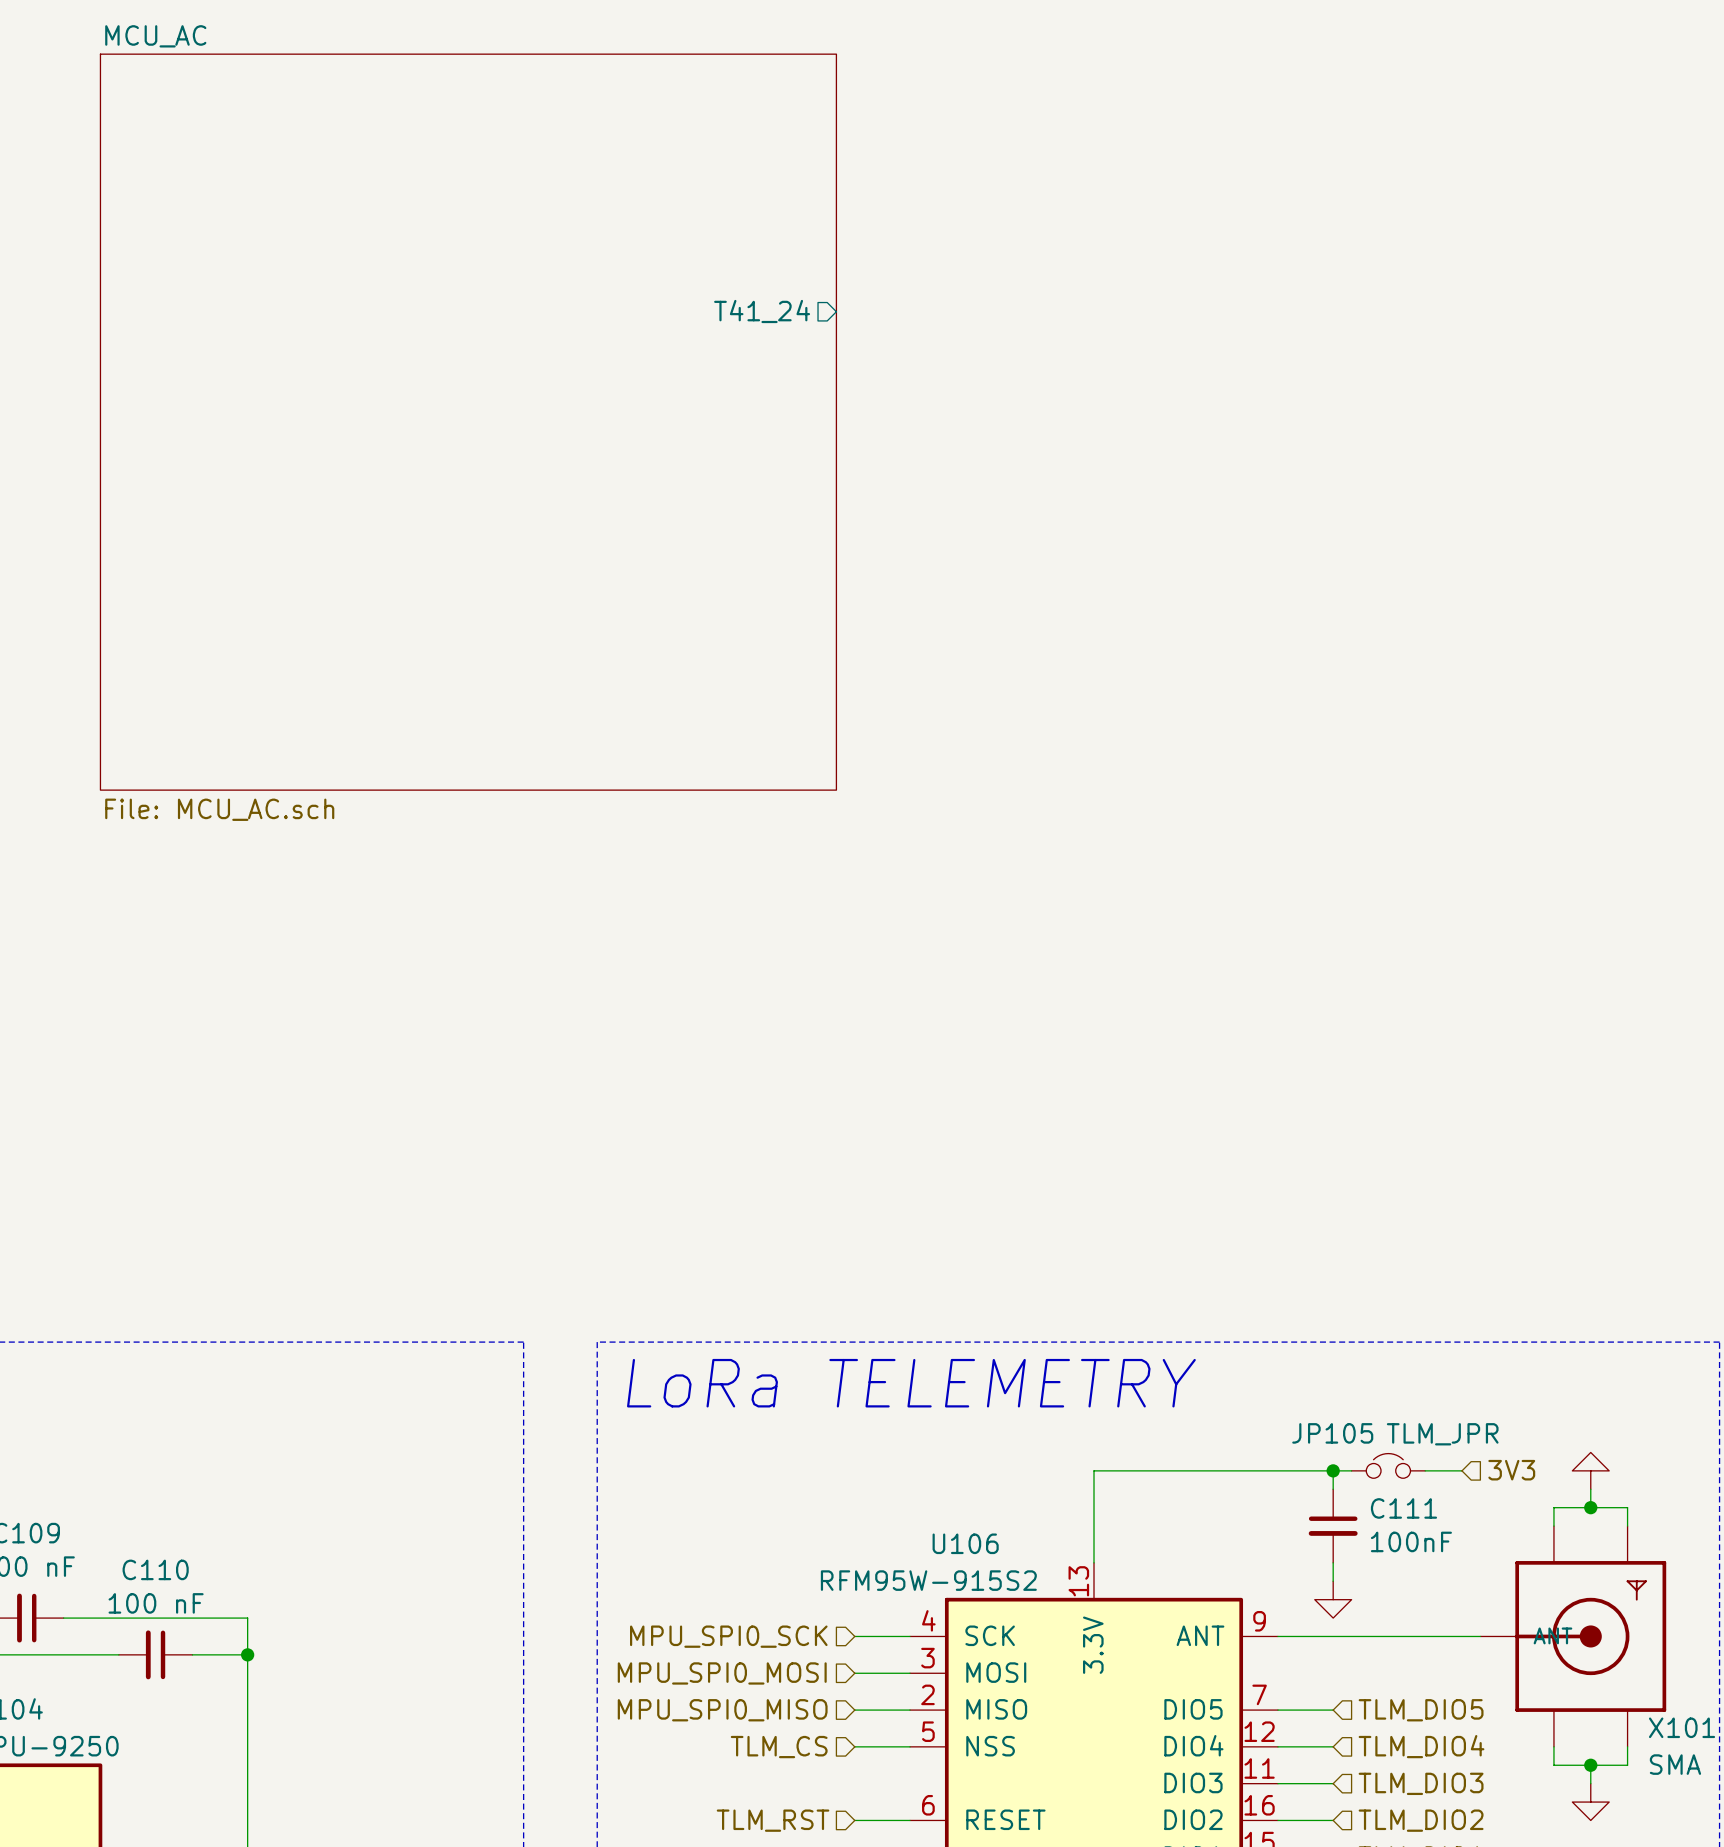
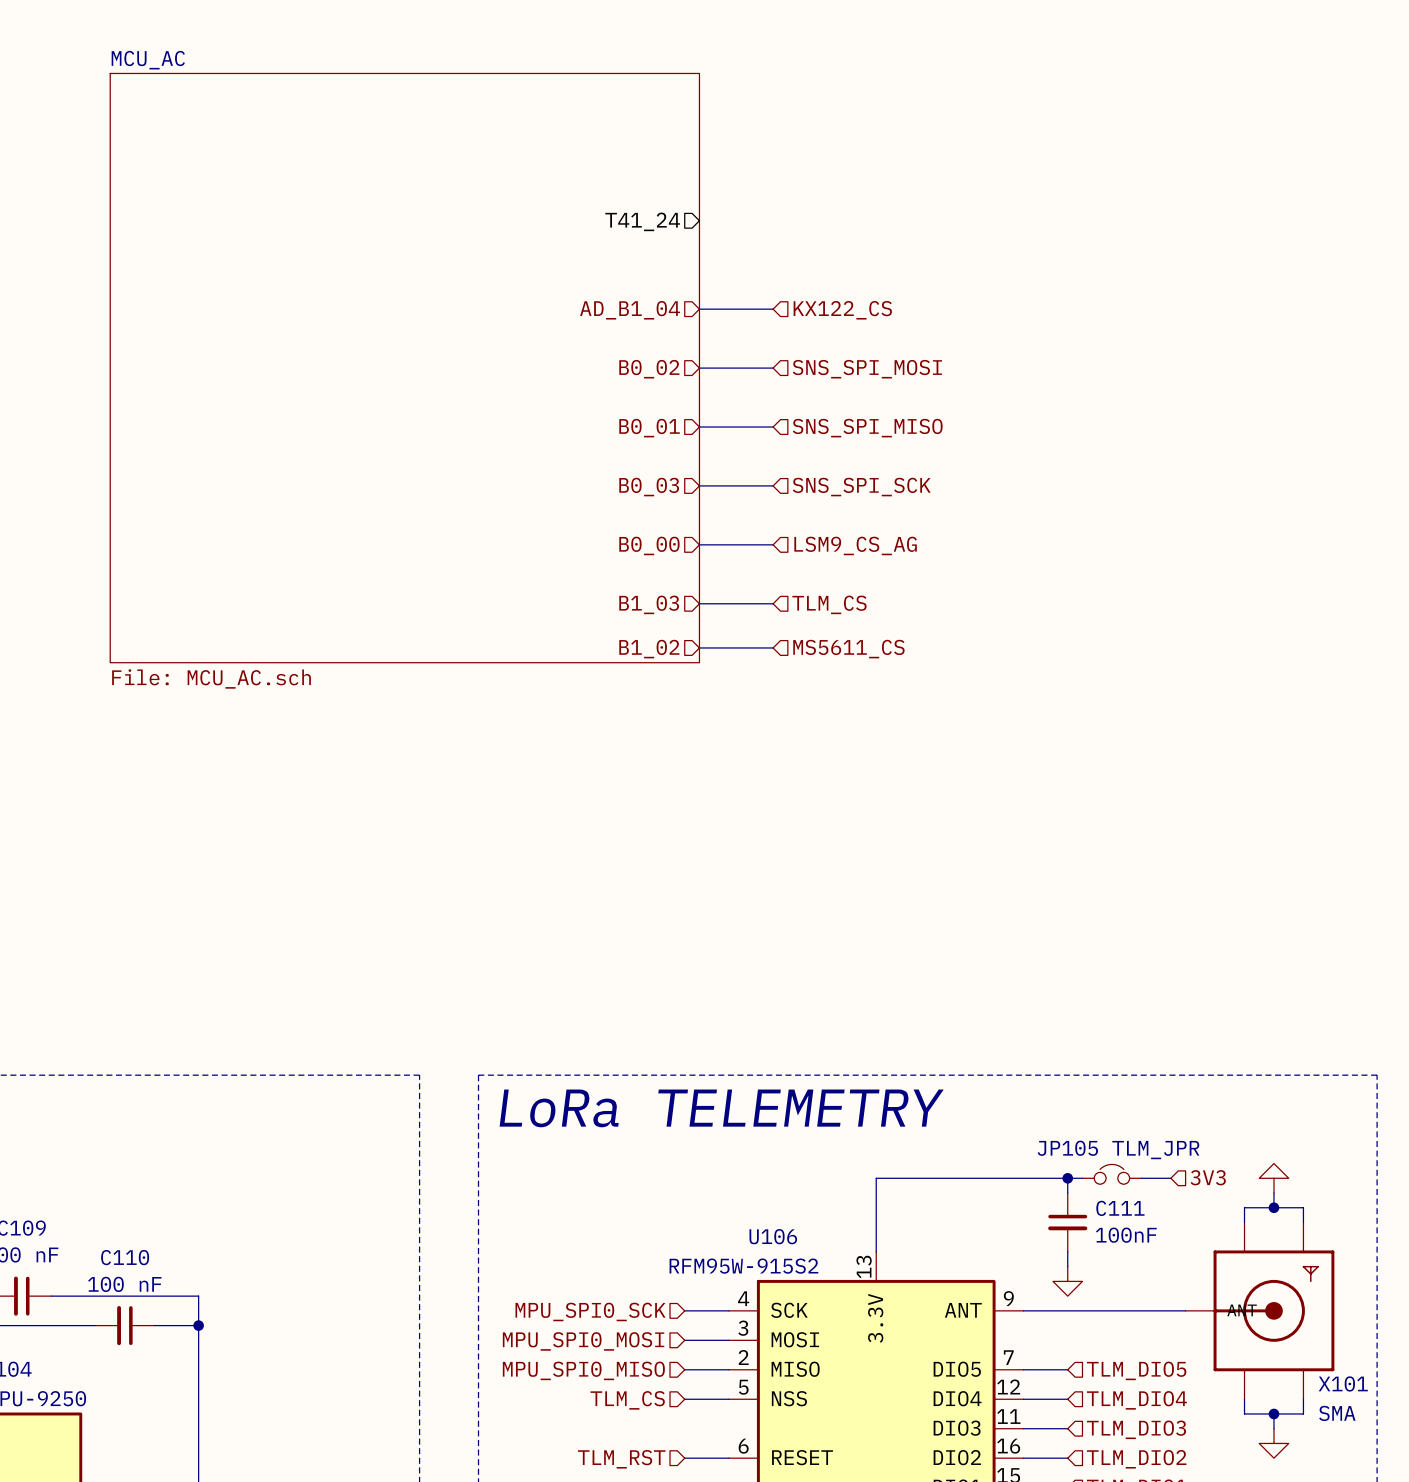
sheet pin position: T41_24 (762, 311) -> T41_24 (642, 221)
hierarchical label: none -> AD_B1_04 (630, 310)
wire: none -> (699, 309) (773, 309)
hierarchical label: none -> KX122_CS (842, 310)
sheet MCU_AC position: (468, 422) -> (404, 368)
wire: none -> (699, 368) (773, 368)
hierarchical label: none -> B0_02 (649, 369)
hierarchical label: none -> SNS_SPI_MOSI (867, 369)
hierarchical label: none -> B0_01 (649, 428)
wire: none -> (699, 427) (773, 427)
hierarchical label: none -> SNS_SPI_MISO (867, 428)
hierarchical label: none -> B0_03 (649, 487)
wire: none -> (699, 485) (773, 485)
hierarchical label: none -> SNS_SPI_SCK (861, 487)
hierarchical label: none -> B0_00 (649, 545)
wire: none -> (699, 544) (773, 544)
hierarchical label: none -> LSM9_CS_AG (855, 545)
hierarchical label: none -> B1_03 (649, 604)
wire: none -> (699, 603) (773, 603)
hierarchical label: none -> TLM_CS (829, 604)
hierarchical label: none -> B1_02 (649, 649)
wire: none -> (699, 647) (773, 647)
hierarchical label: none -> MS5611_CS (848, 649)

